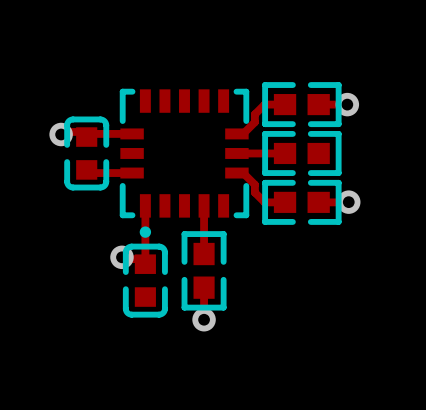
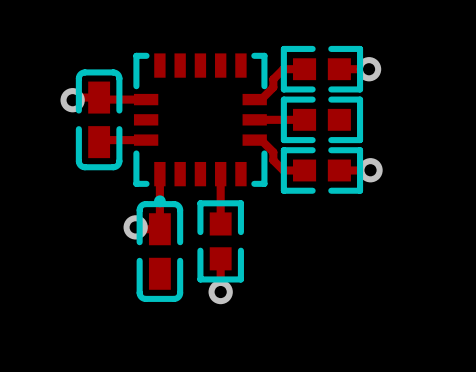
part footprint: [64, 116, 110, 191] -> [75, 69, 123, 171]
part footprint: [122, 243, 168, 318] -> [136, 201, 184, 302]

